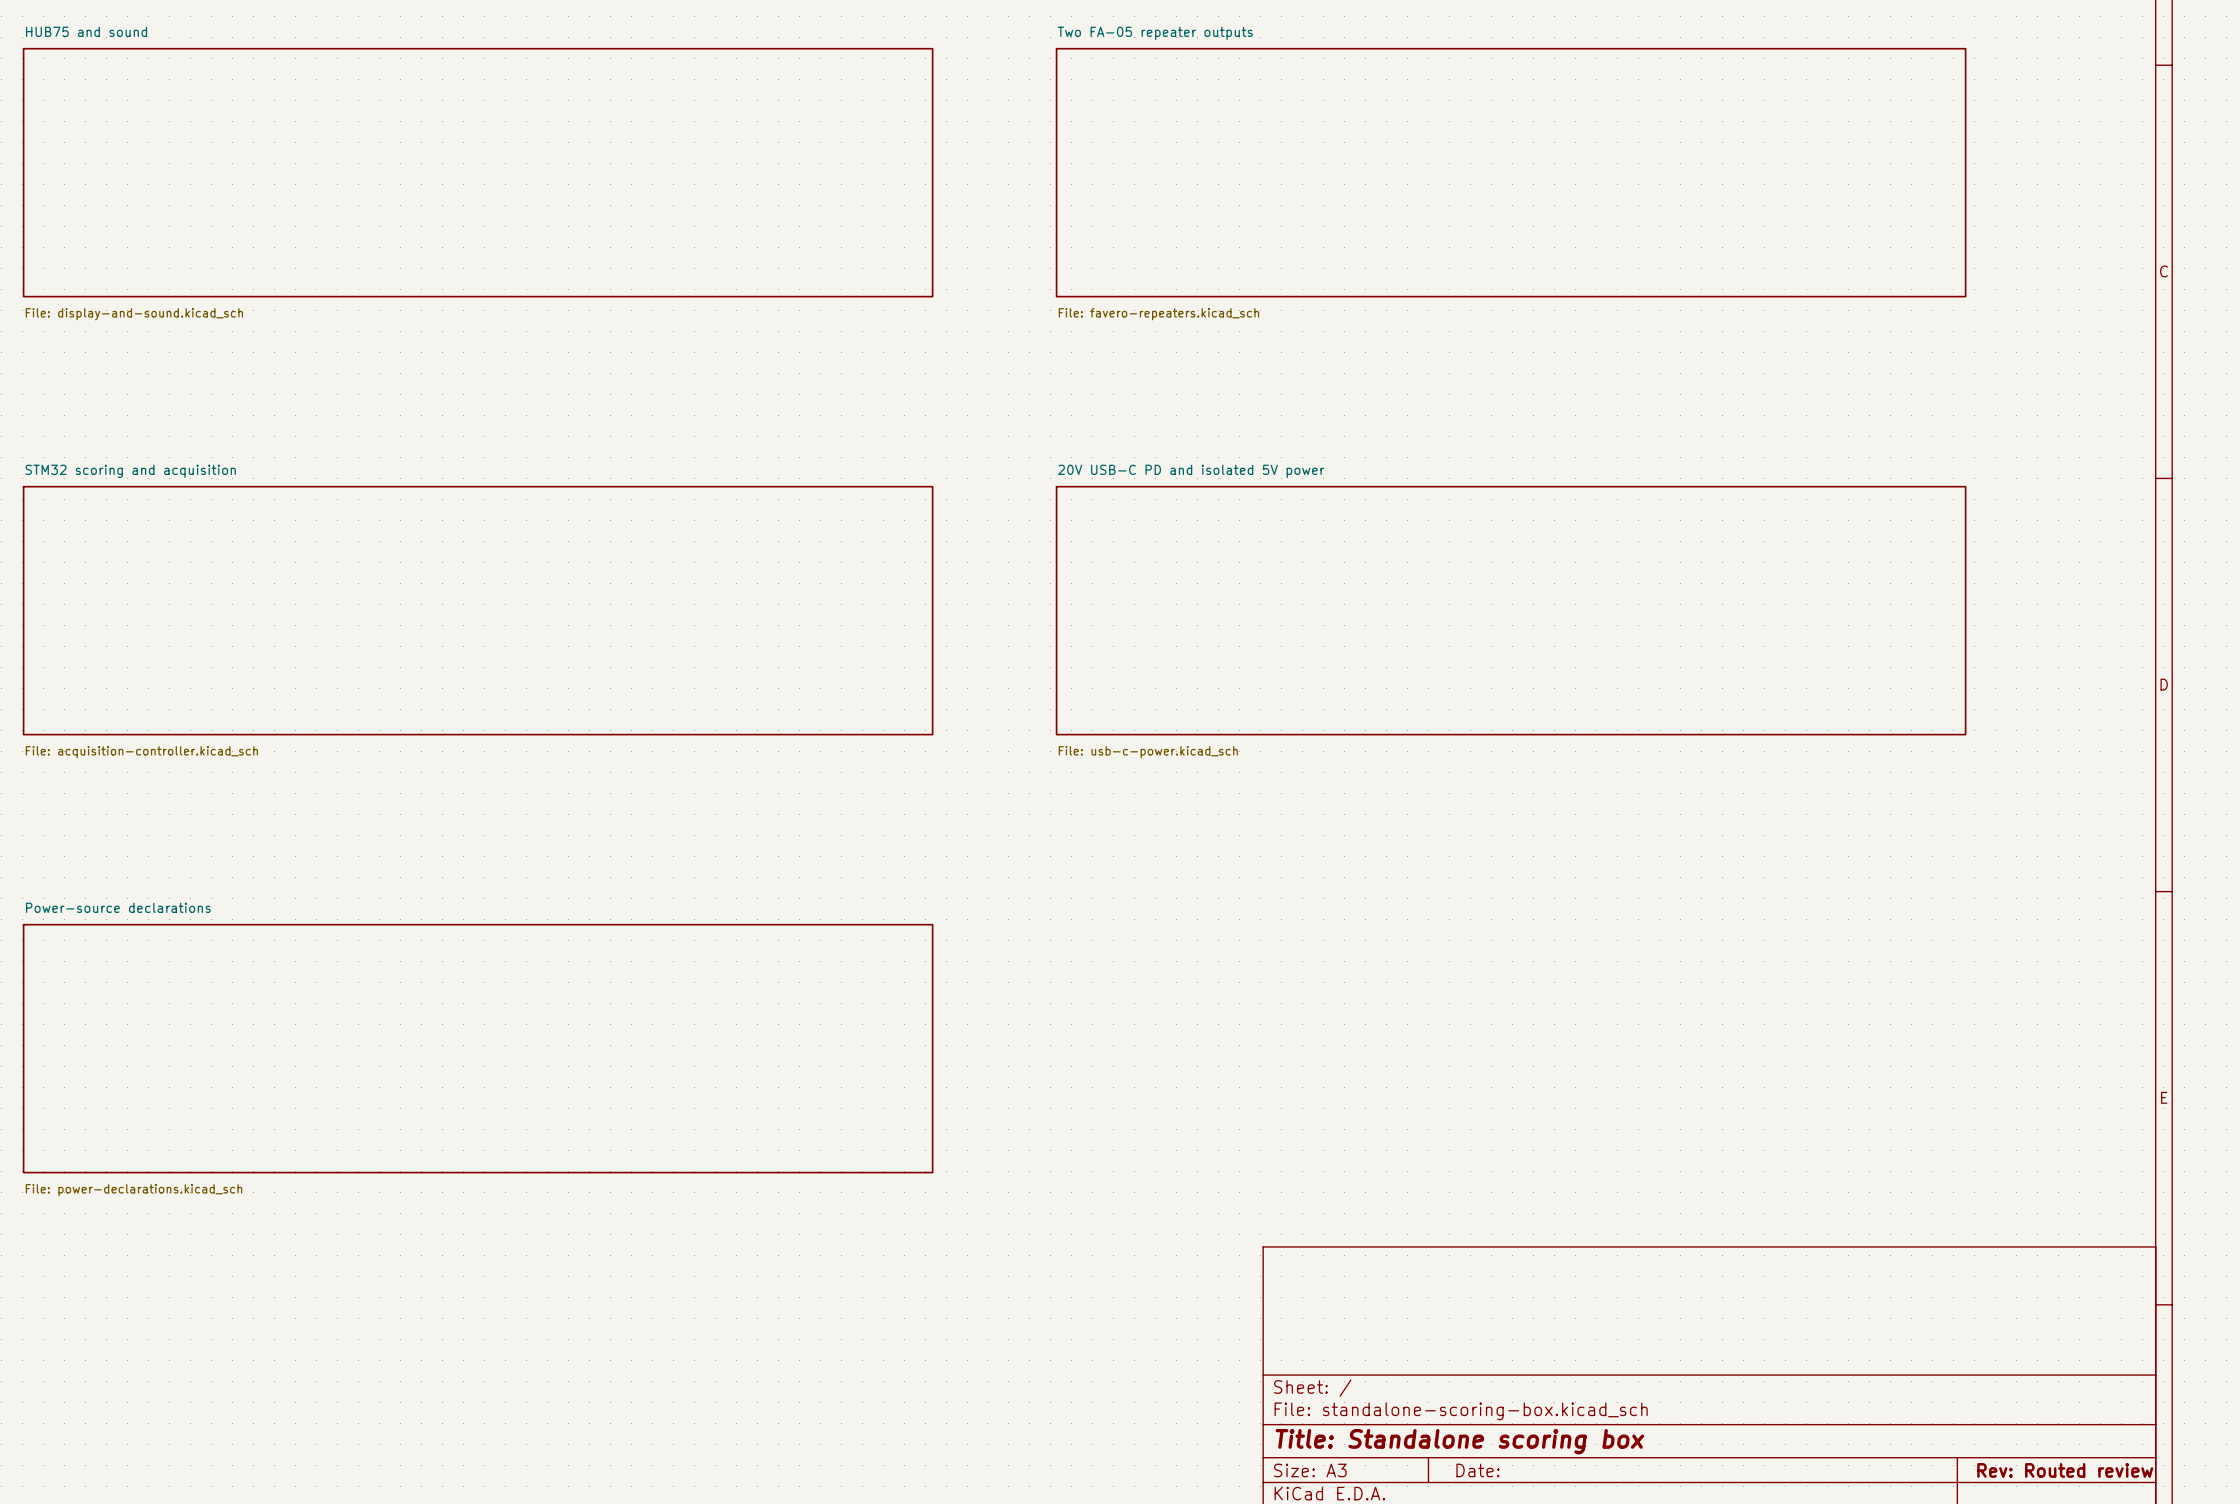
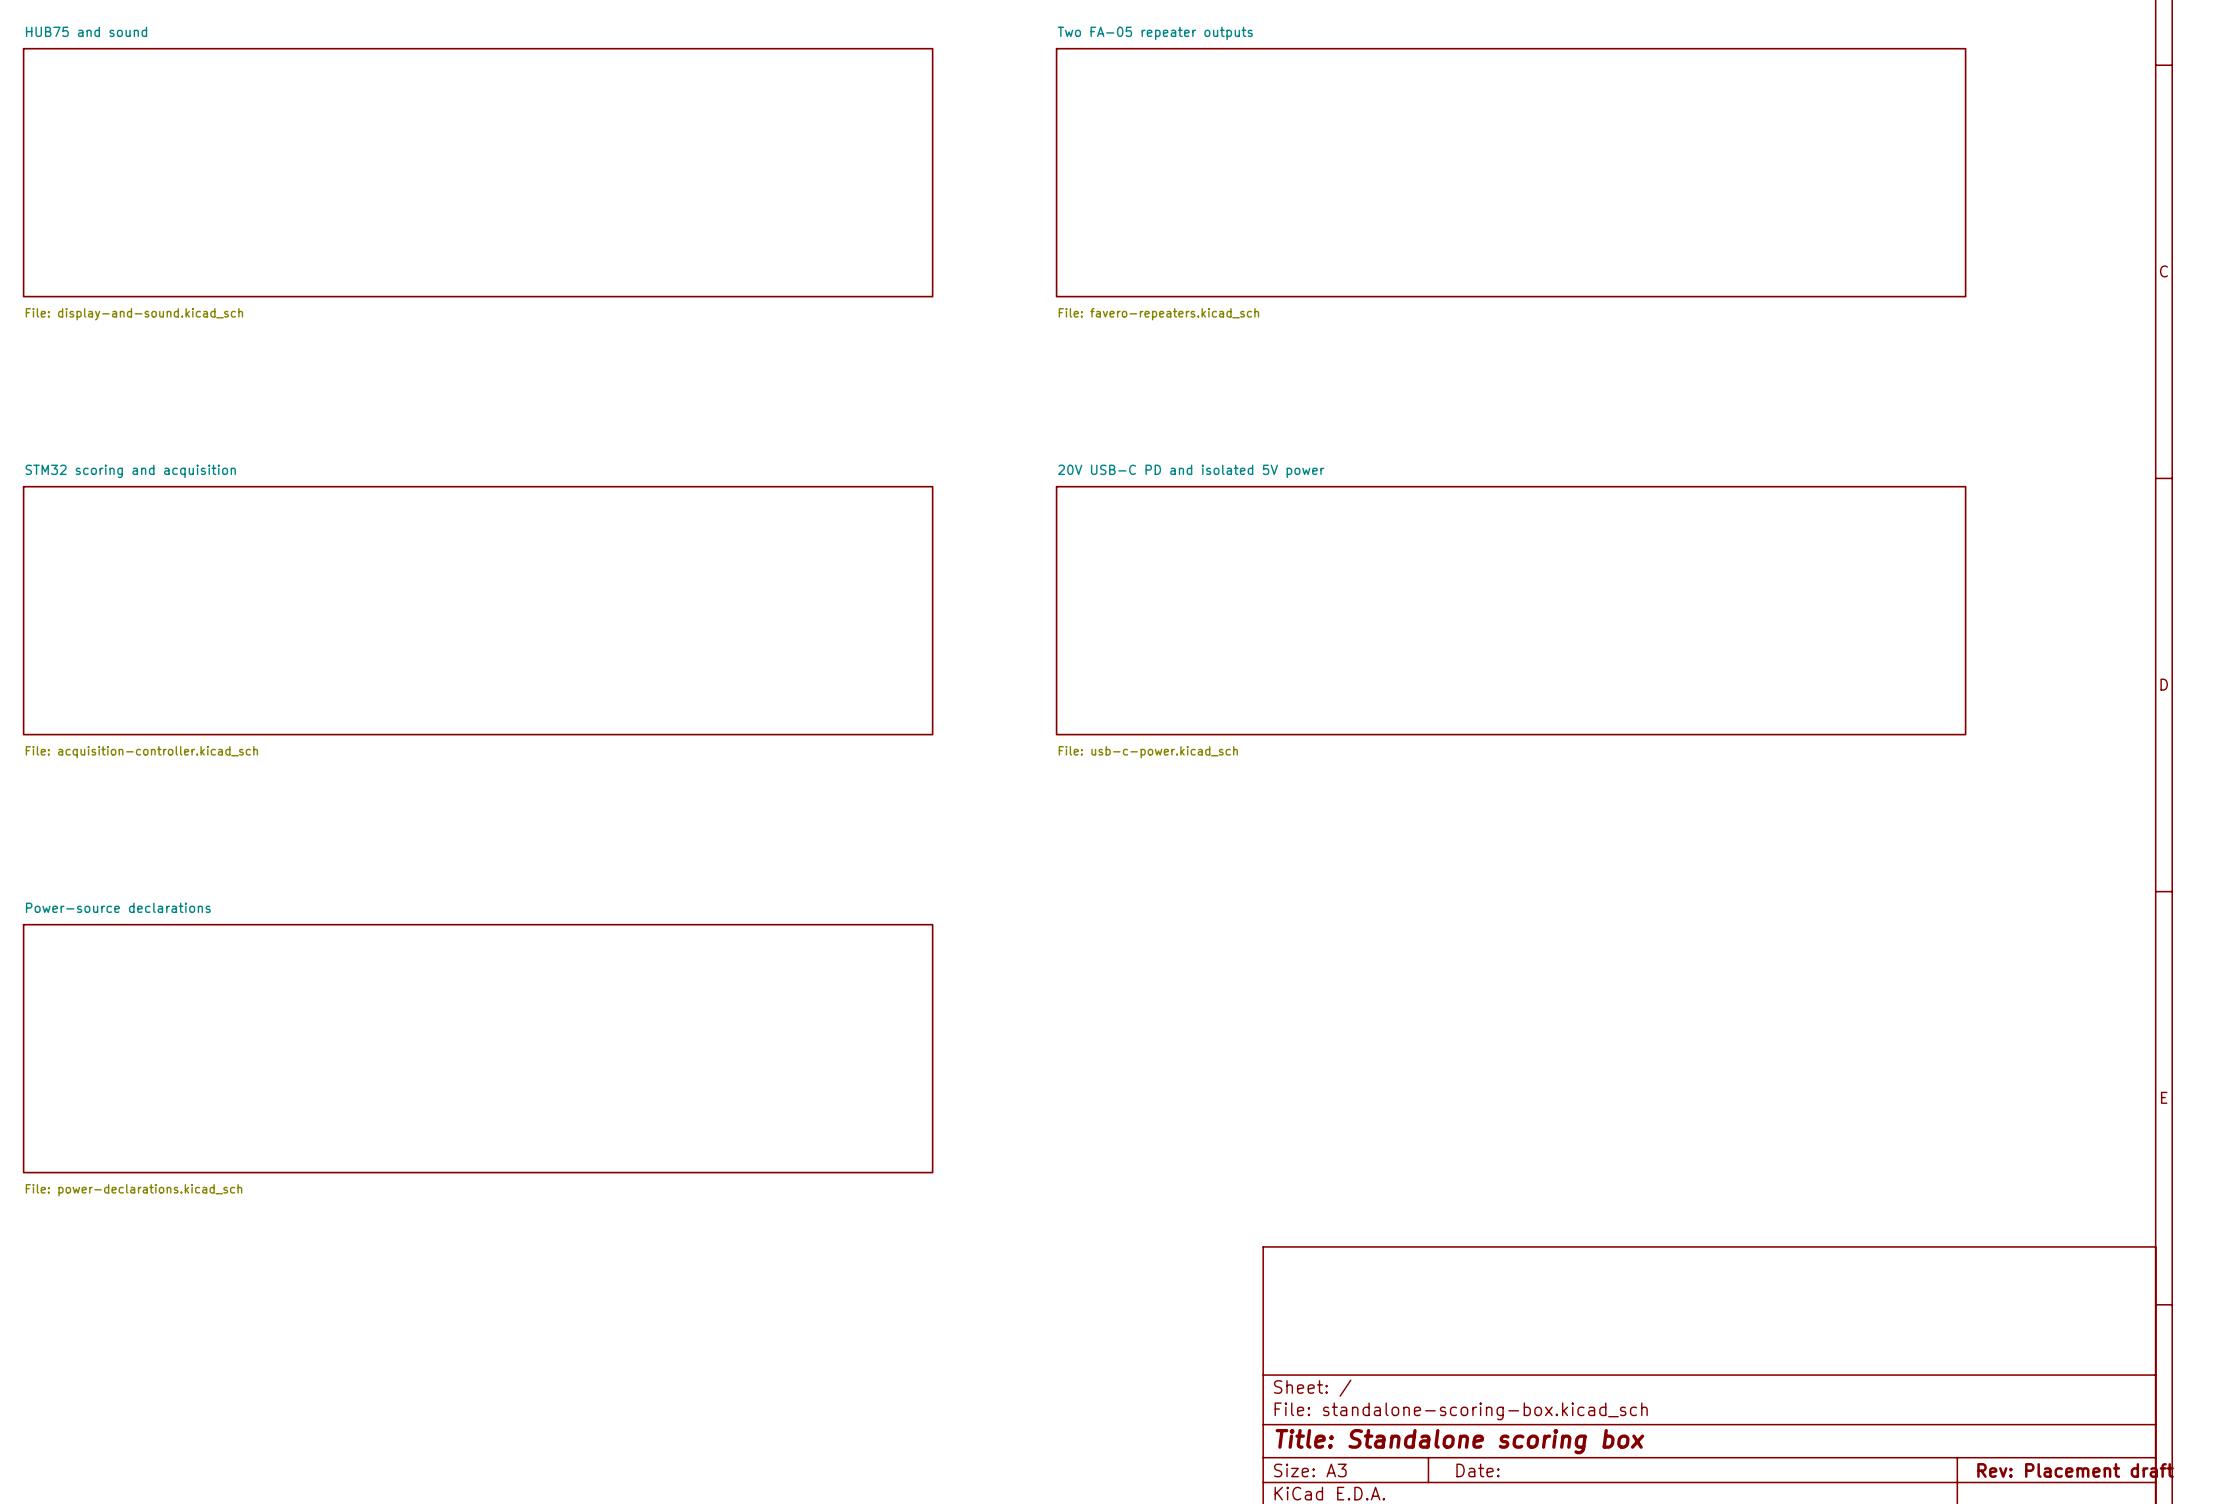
title block: Rev: Routed review (2065, 1470) -> Rev: Placement draft (2075, 1470)

